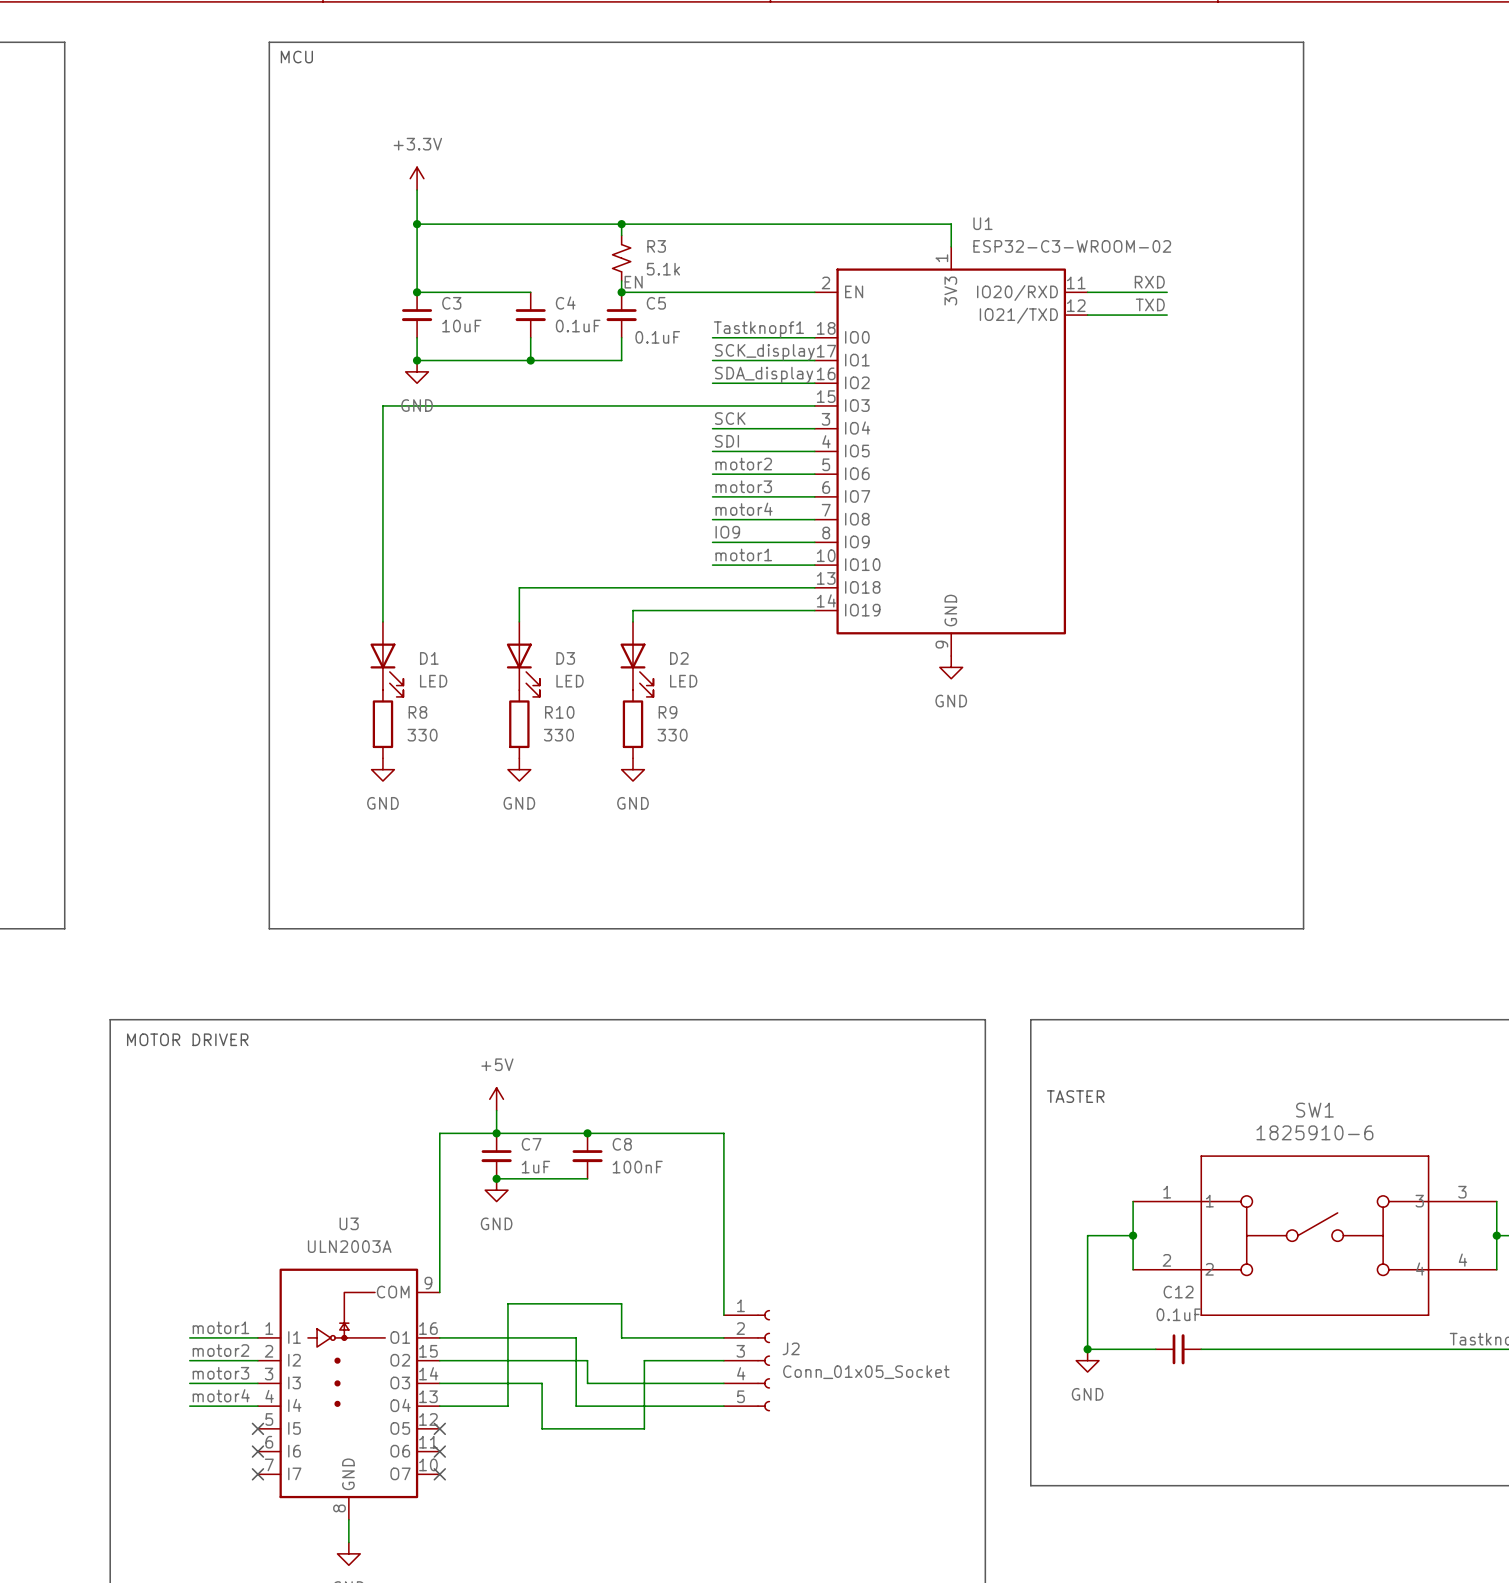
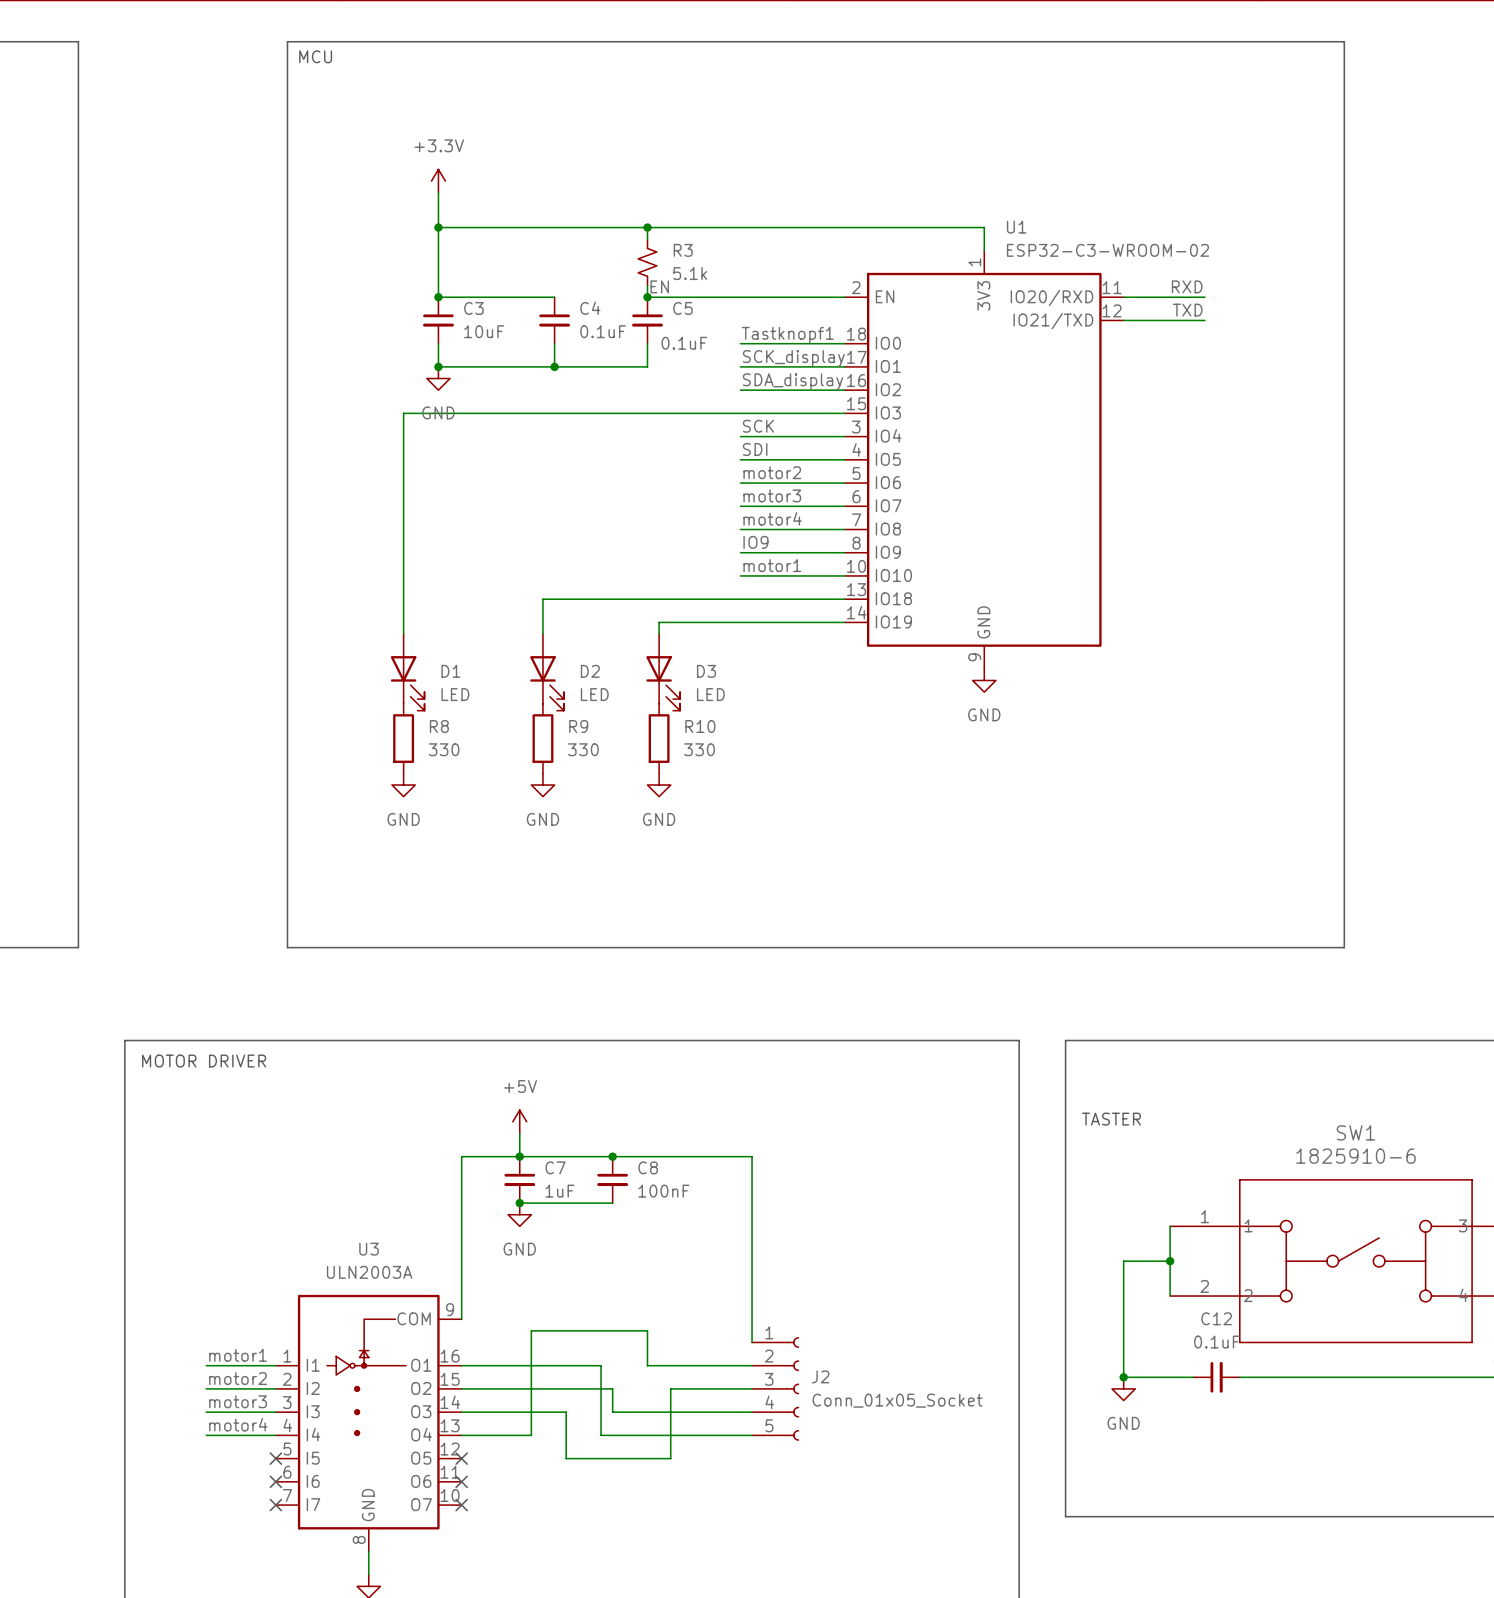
D3 name: D3 (565, 658) -> D2 (590, 671)
D2 name: D2 (679, 658) -> D3 (706, 671)
R10 name: R10 (559, 712) -> R9 (578, 726)
R9 name: R9 (667, 712) -> R10 (700, 726)

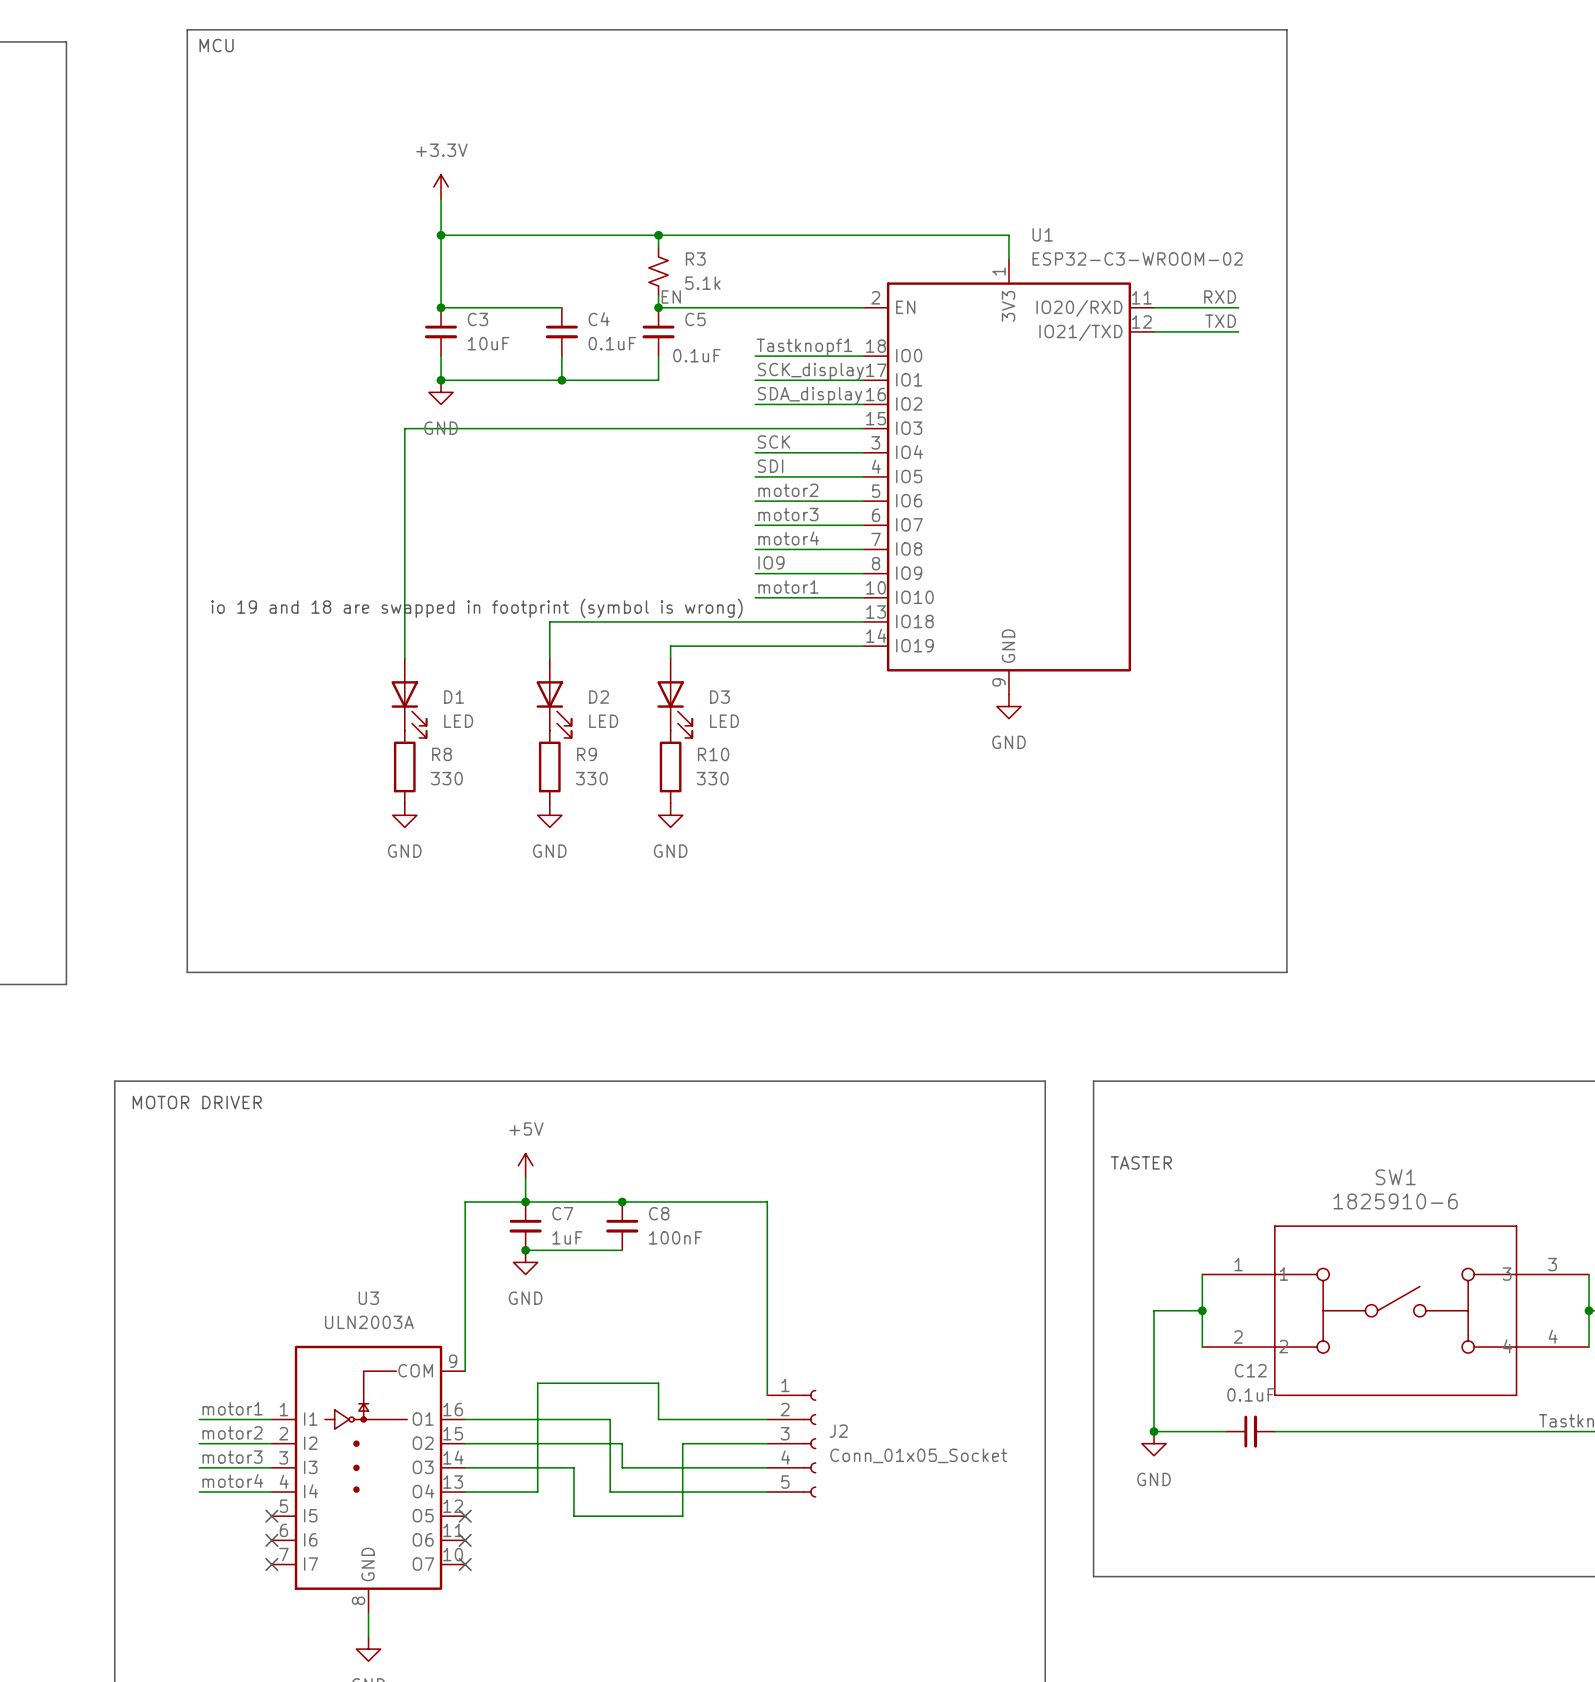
line: (287, 41) (1344, 41) (1344, 947) (287, 947) (287, 41) -> (187, 29) (187, 972) (1286, 972) (1286, 29) (187, 29)
text position: MCU (315, 56) -> MCU (216, 45)
text: none -> io 19 and 18 are swapped in footprint (symbol is wrong) (477, 608)

